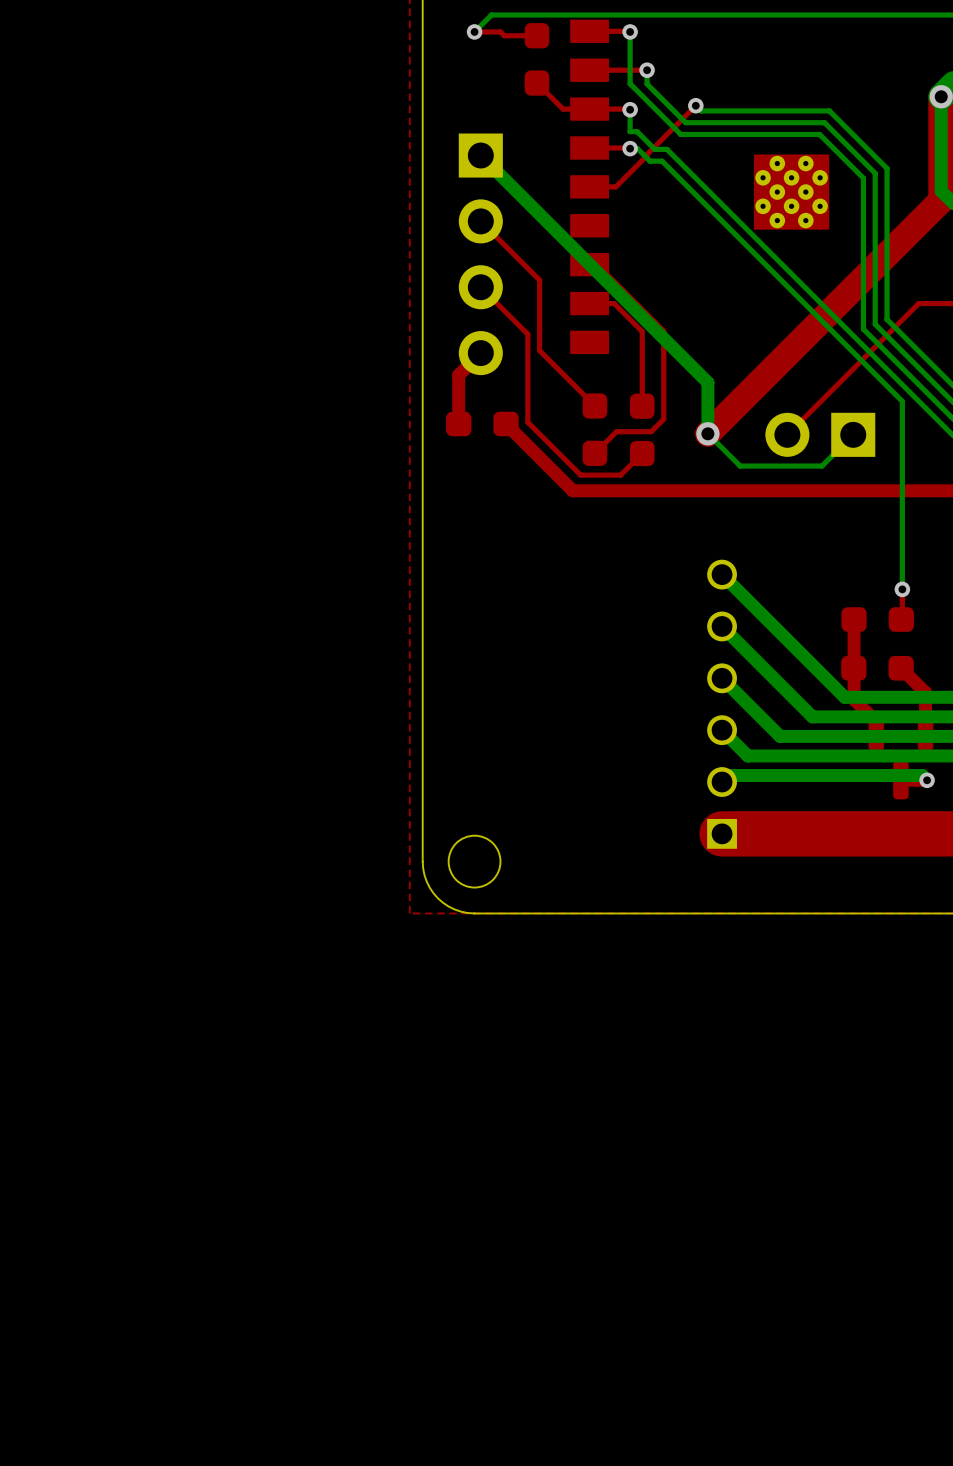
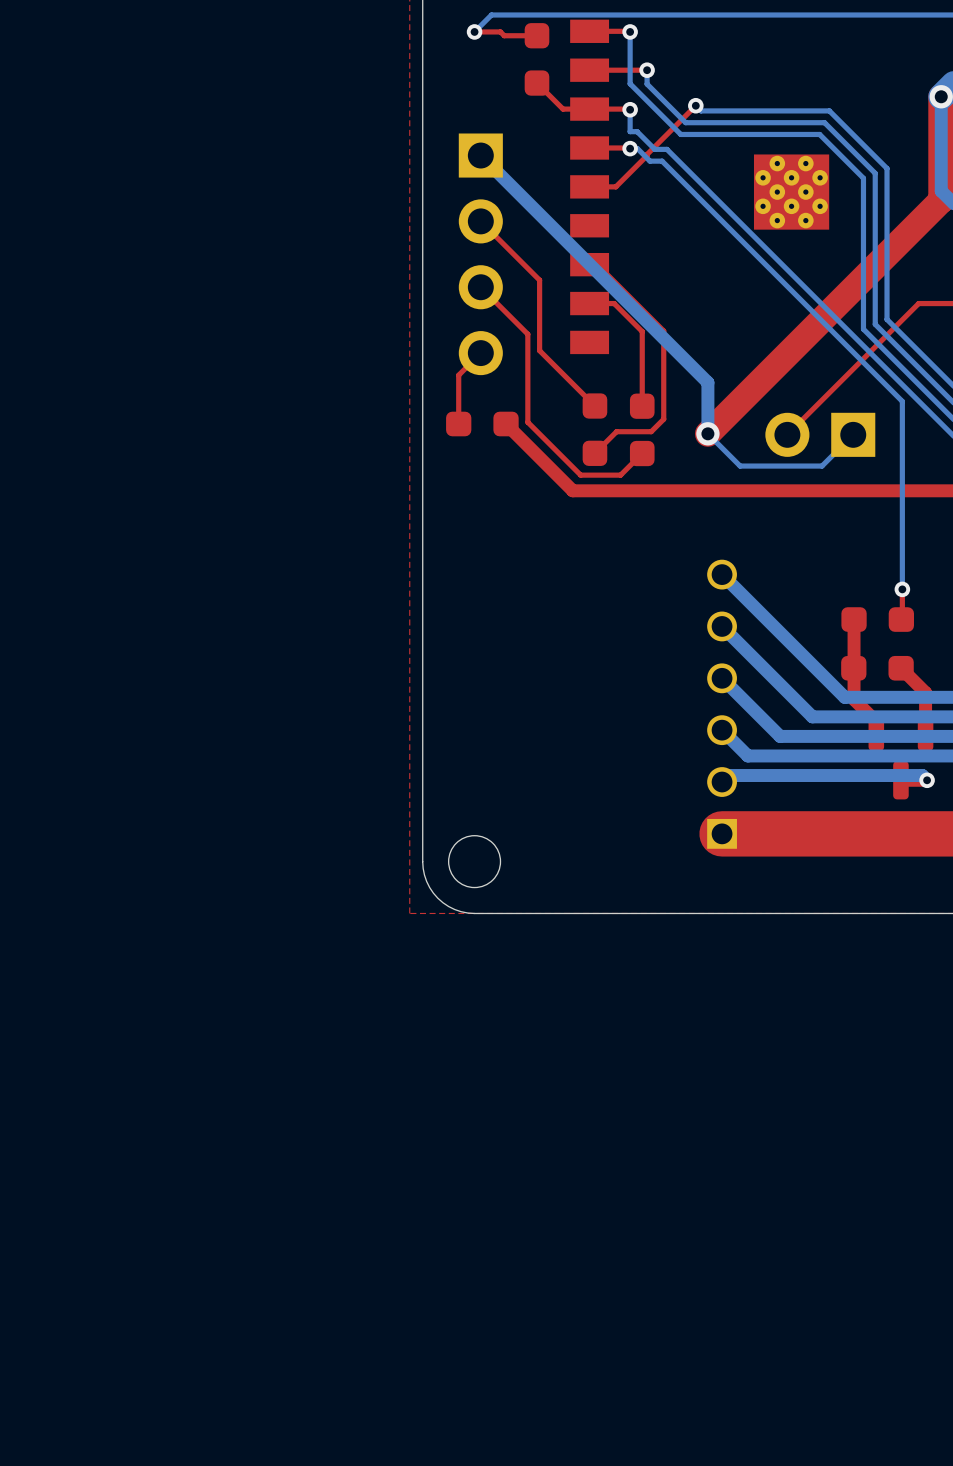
top track width: thick (480, 353) (458, 375) (458, 424) -> thin (480, 353) (458, 375) (458, 424)

